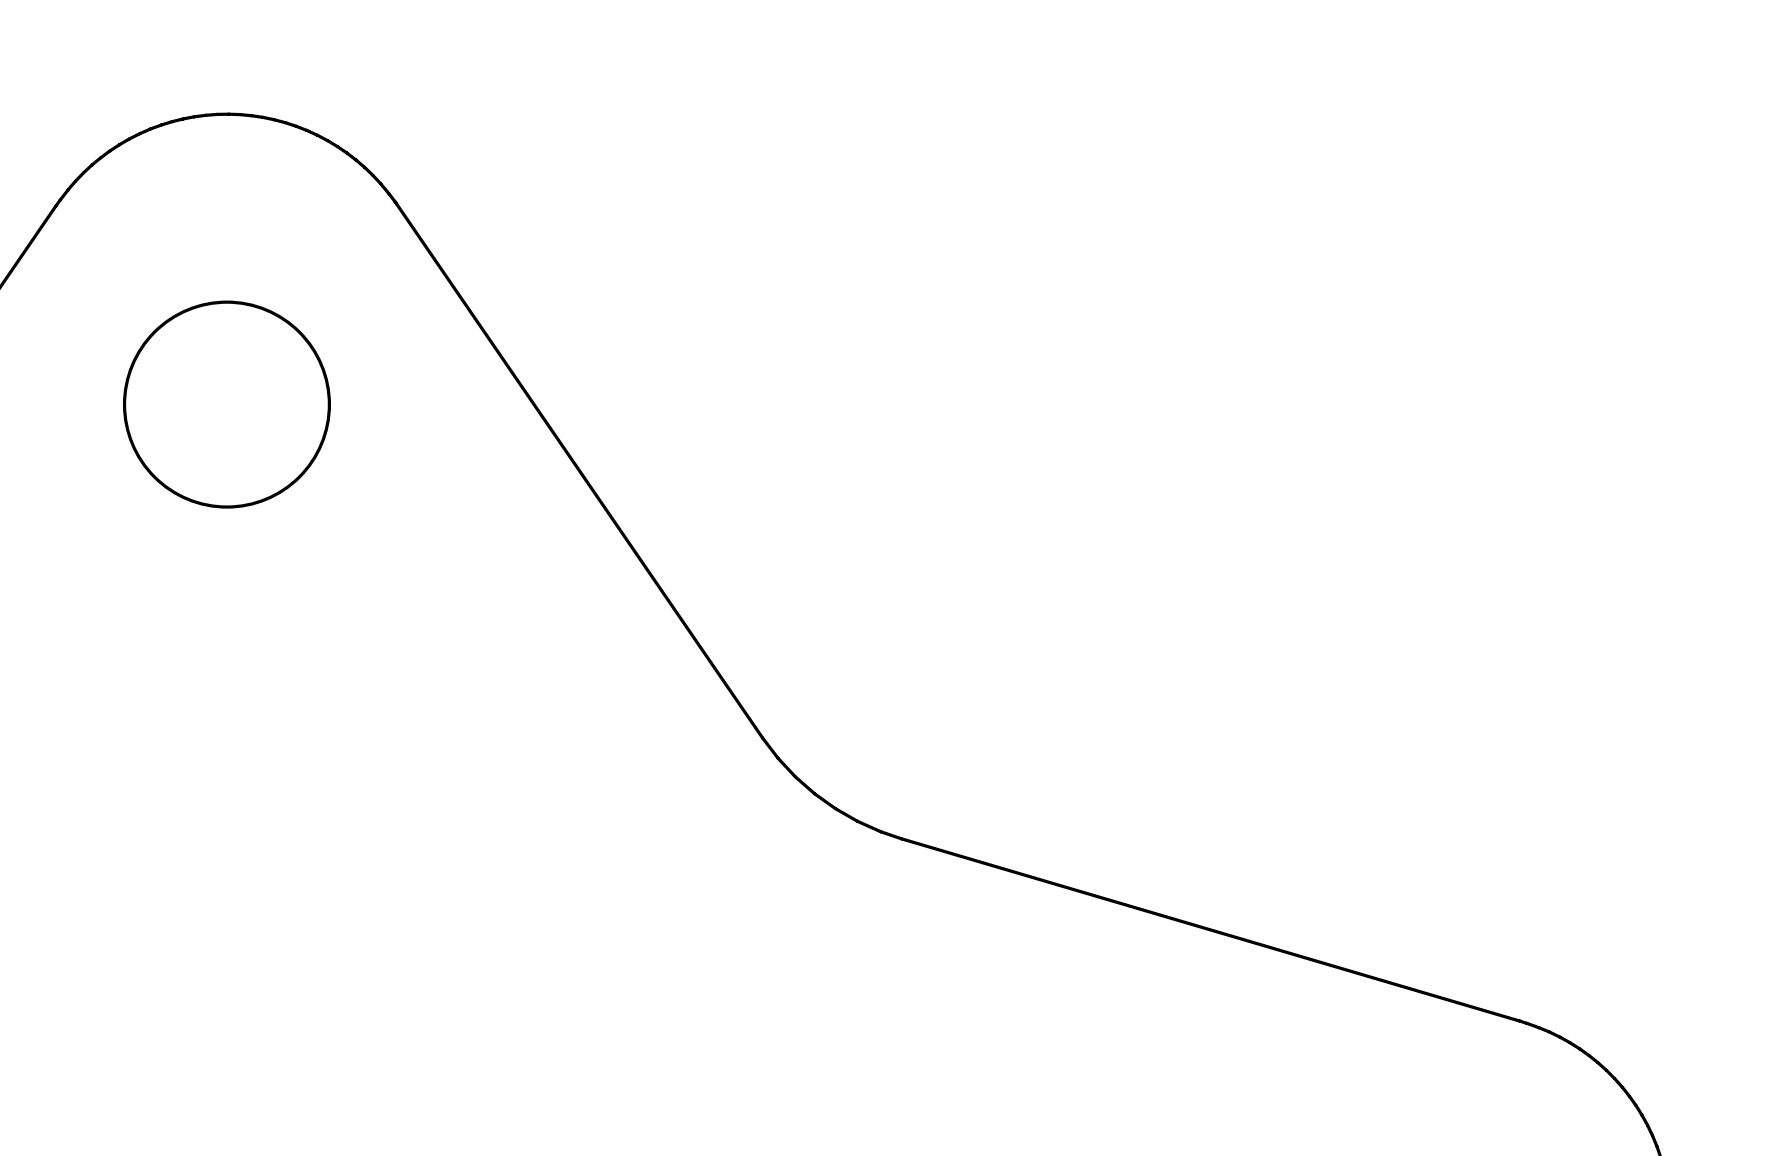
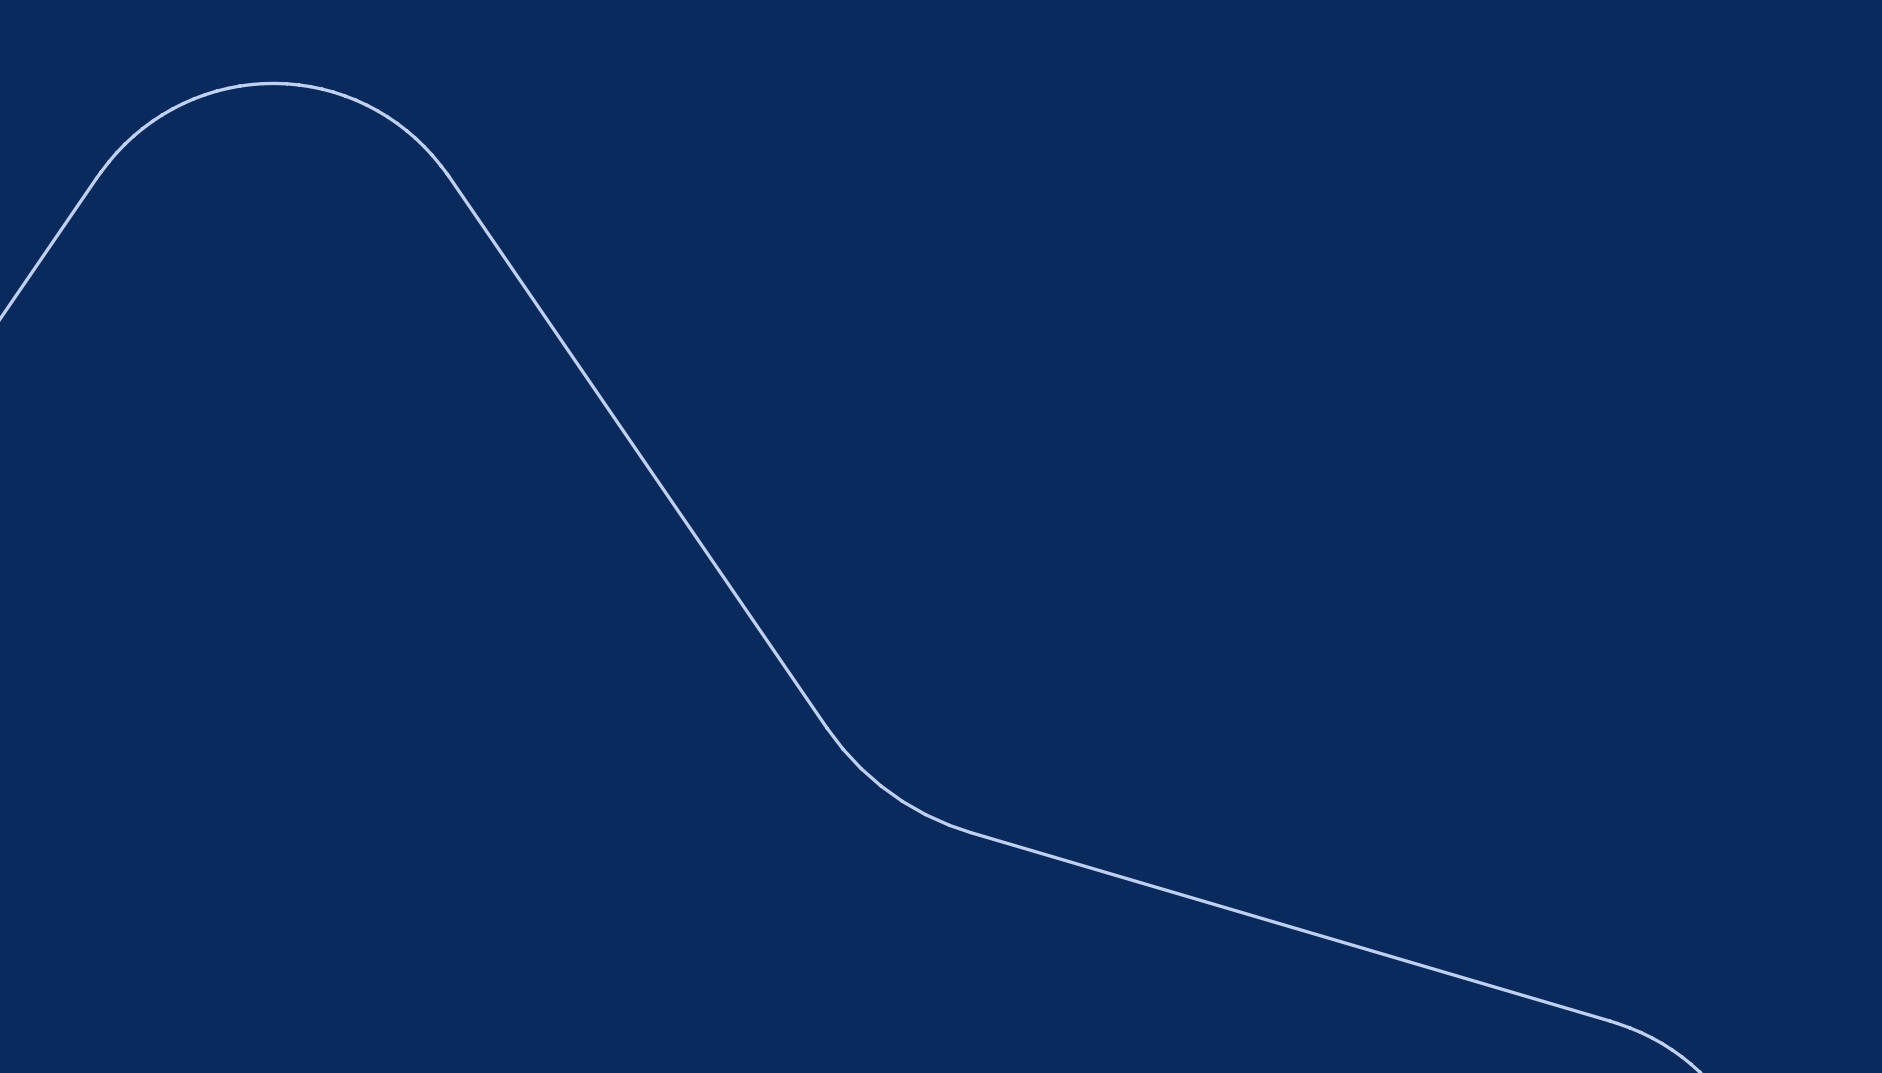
round board edge: [122, 300, 332, 509] -> none

